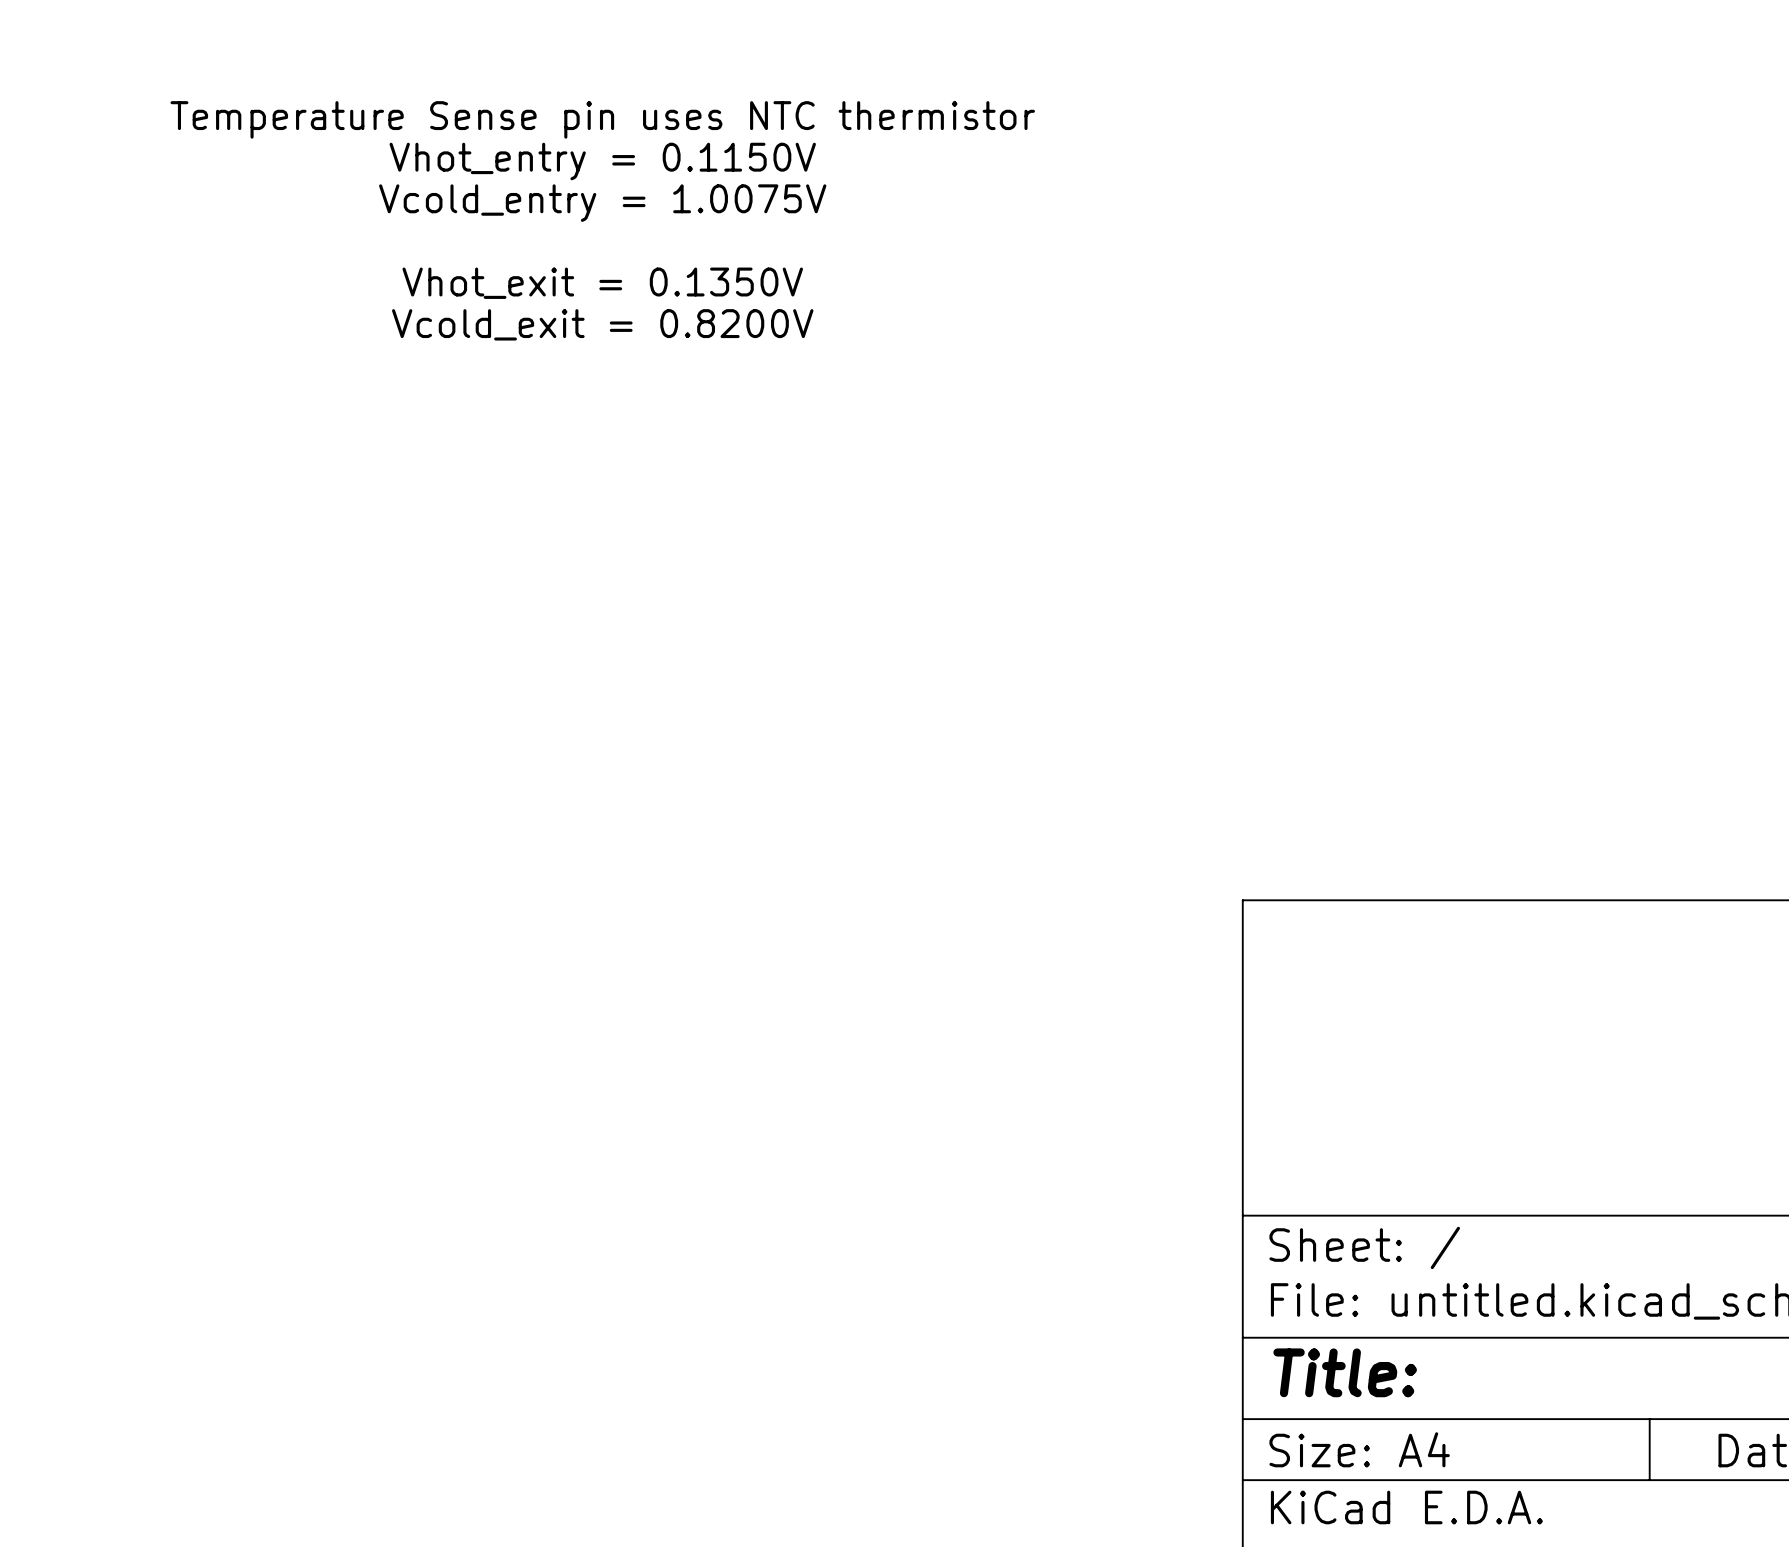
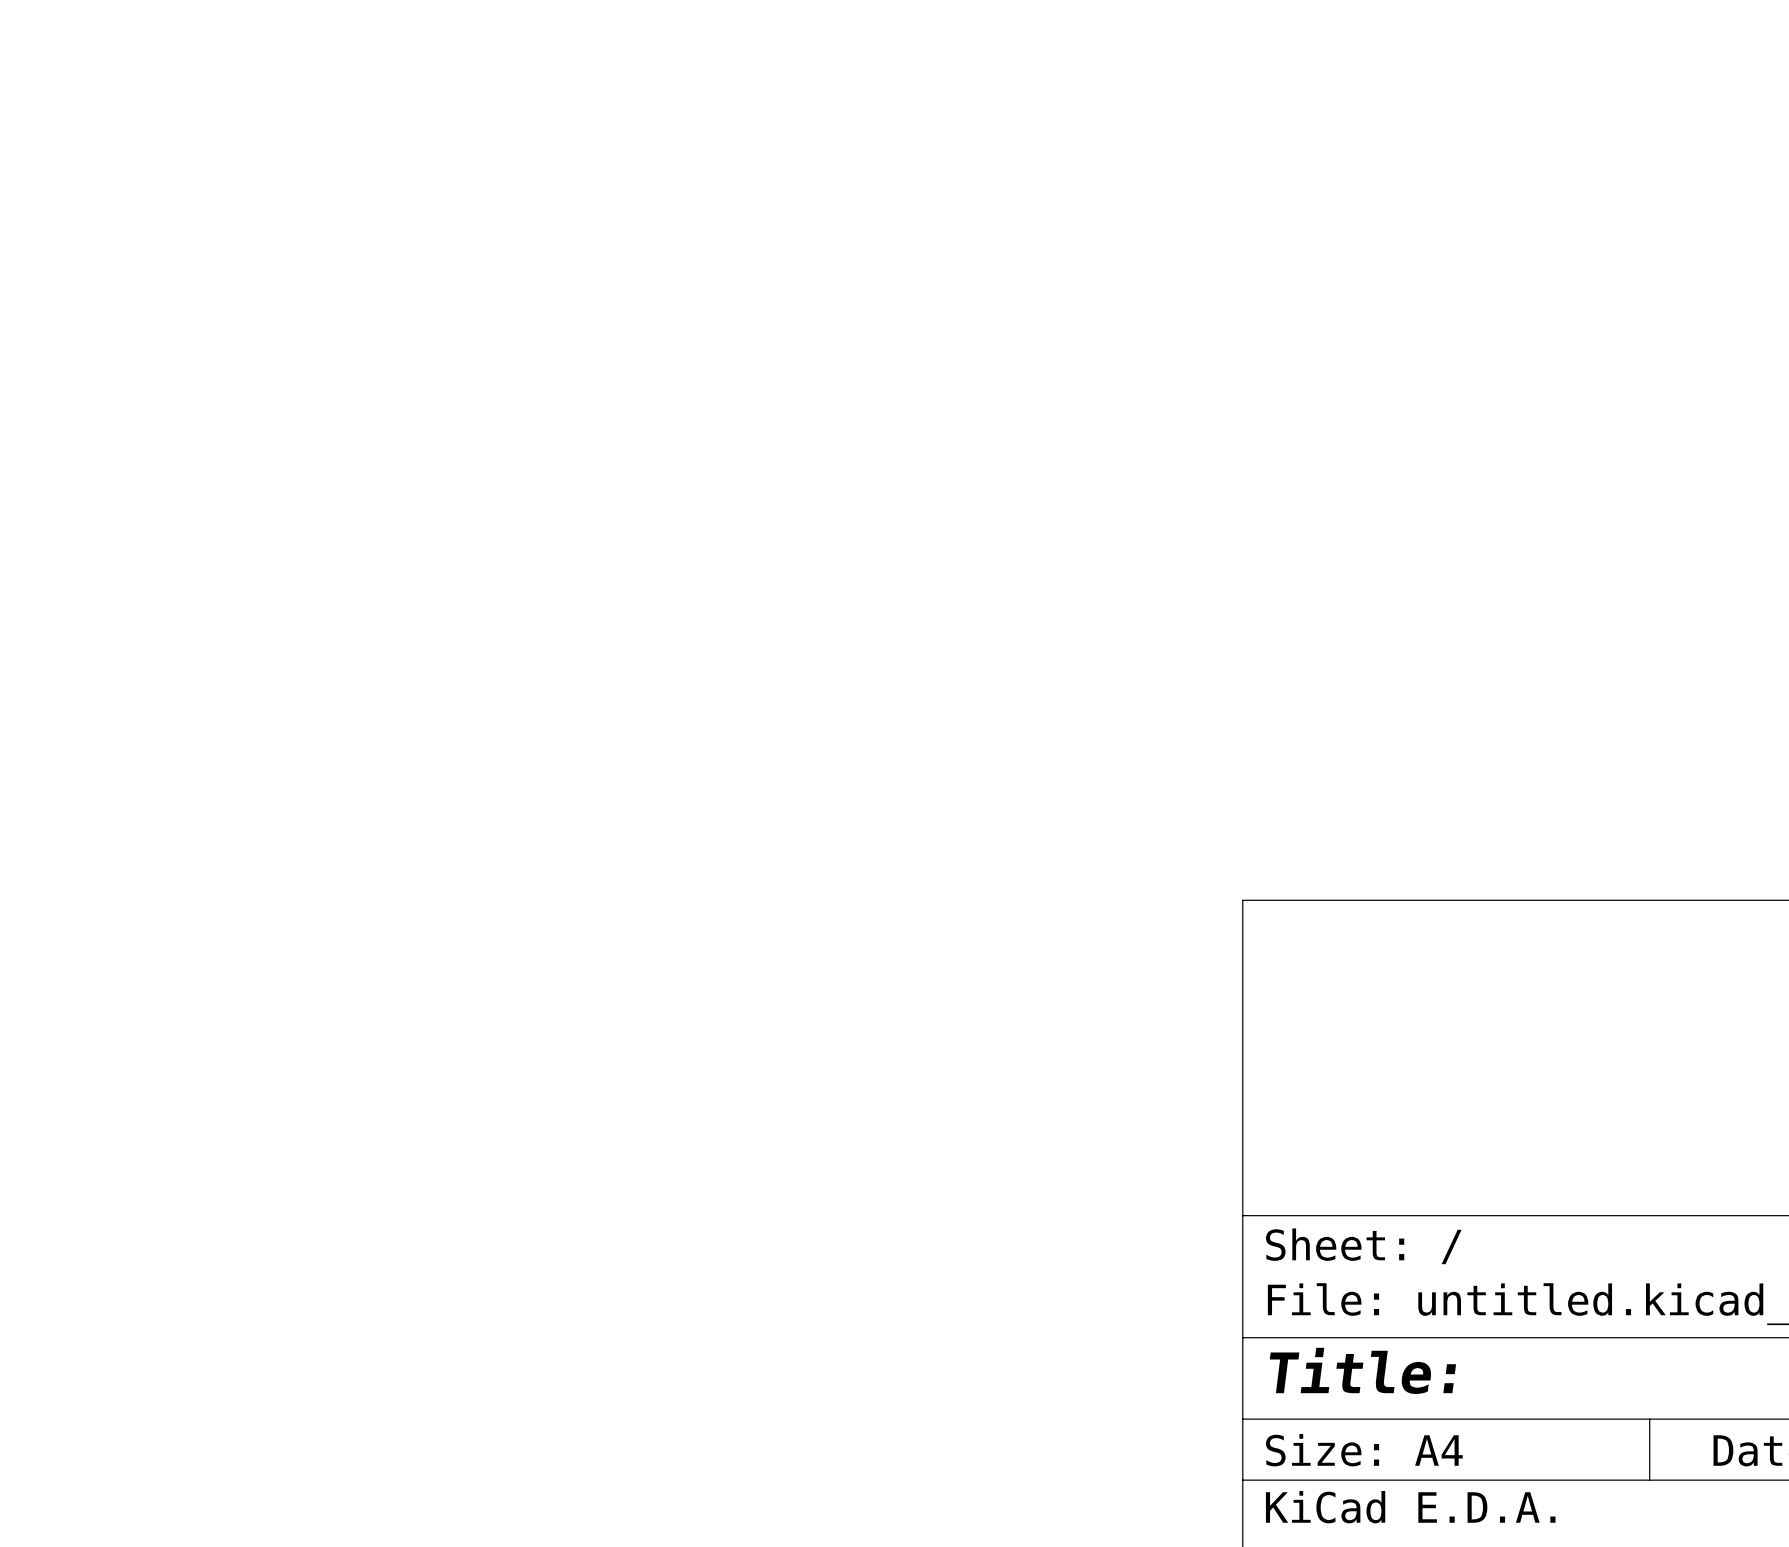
text: Temperature Sense pin uses NTC thermistor (602, 119) -> none
text: Vhot_entry = 0.1150V (602, 161) -> none
text: Vcold_entry = 1.0075V (602, 203) -> none
text: Vhot_exit = 0.1350V (602, 283) -> none
text: Vcold_exit = 0.8200V (602, 324) -> none

